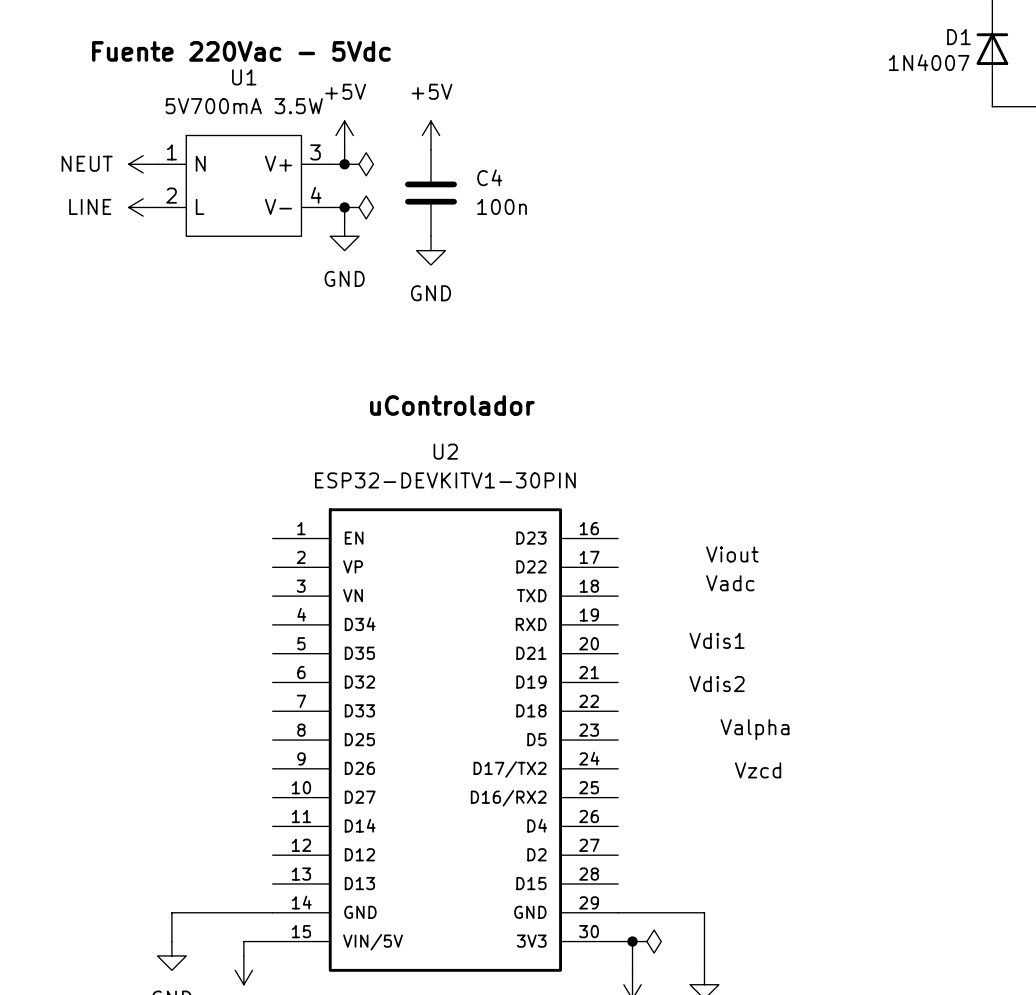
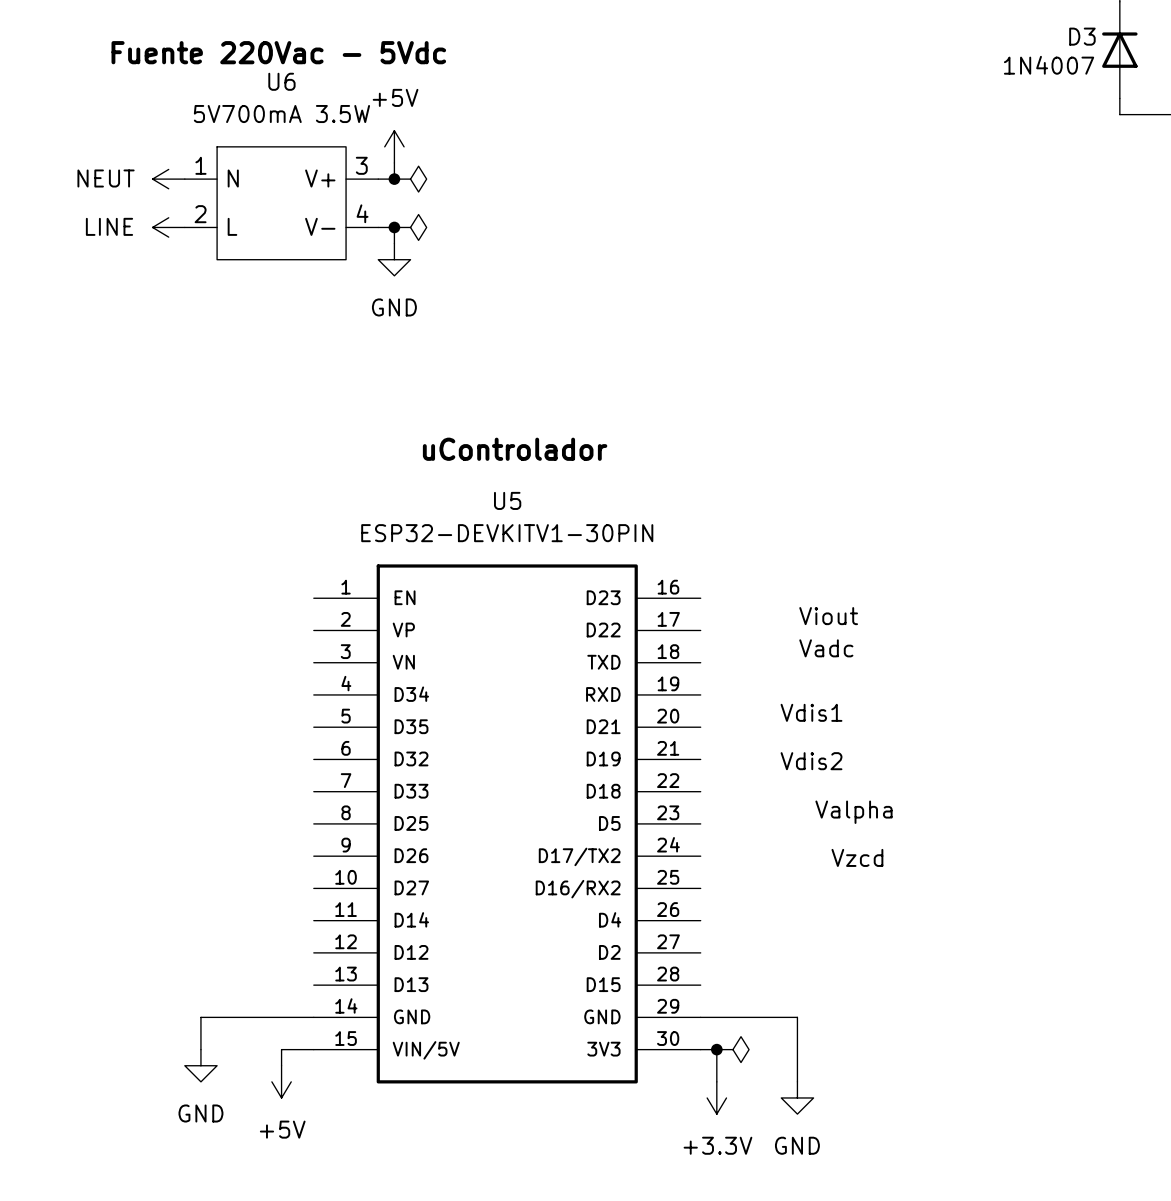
D1 name: D1 (958, 37) -> D3 (1082, 36)
U1 name: U1 (244, 77) -> U6 (281, 81)
power symbol: +5V (431, 135) -> none
C4: 100n (431, 193) -> none
power symbol: GND (431, 250) -> none
U2 name: U2 (445, 451) -> U5 (507, 500)

